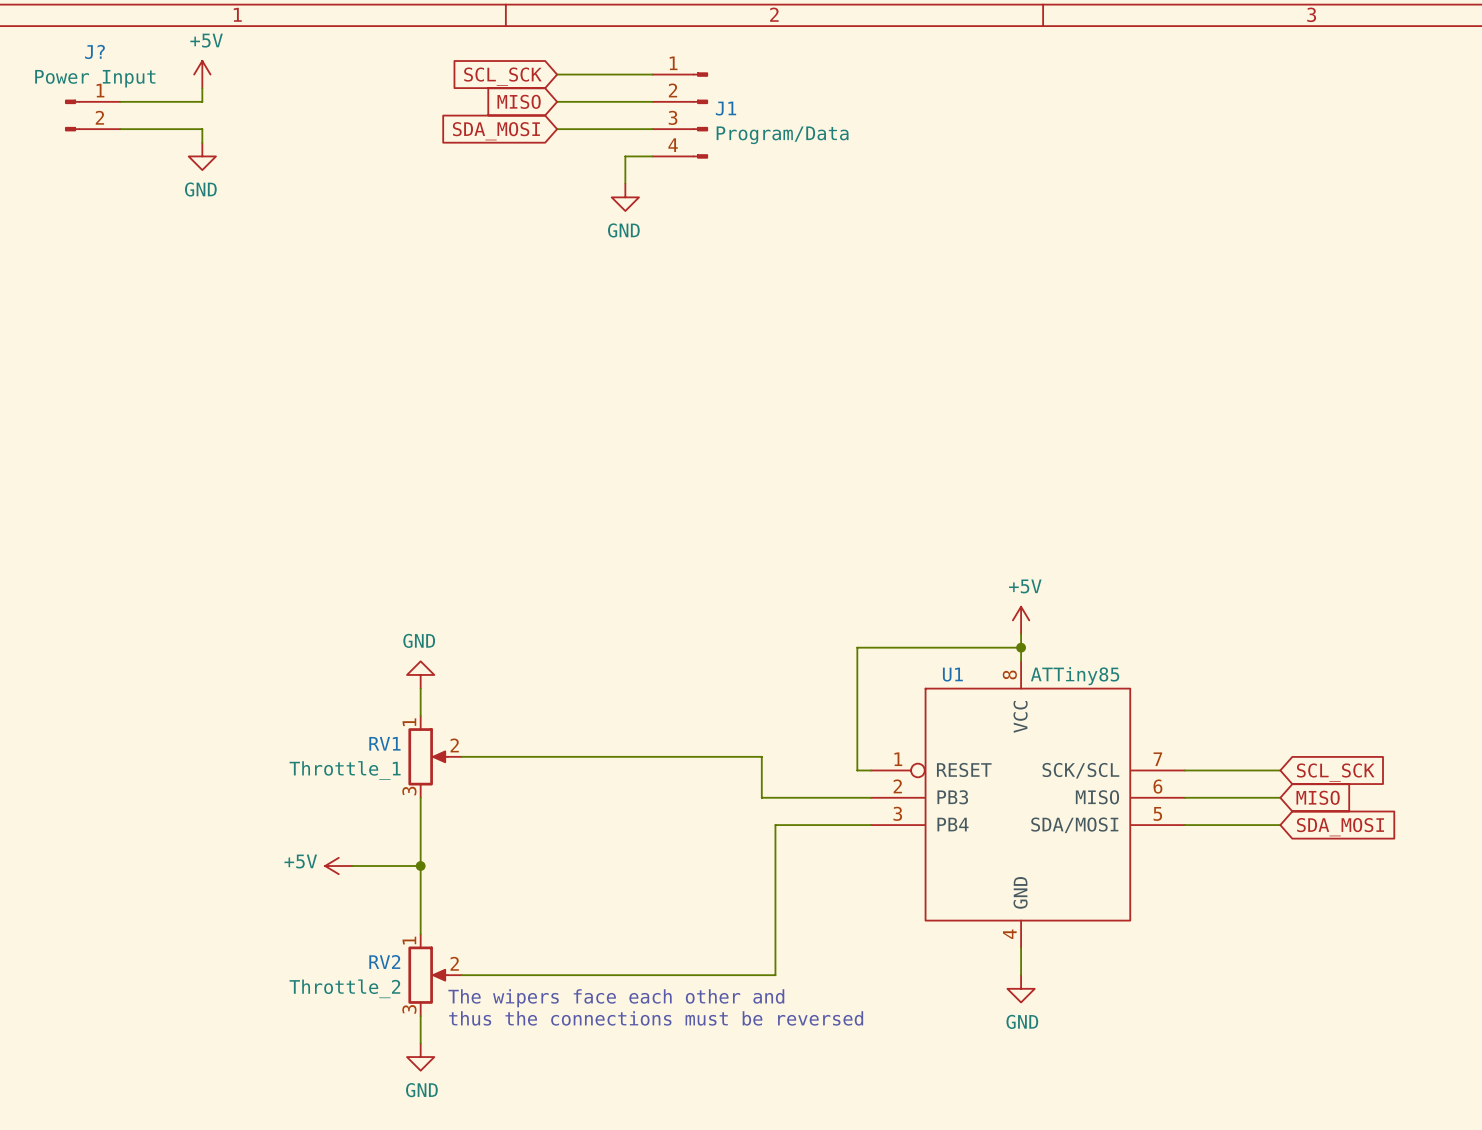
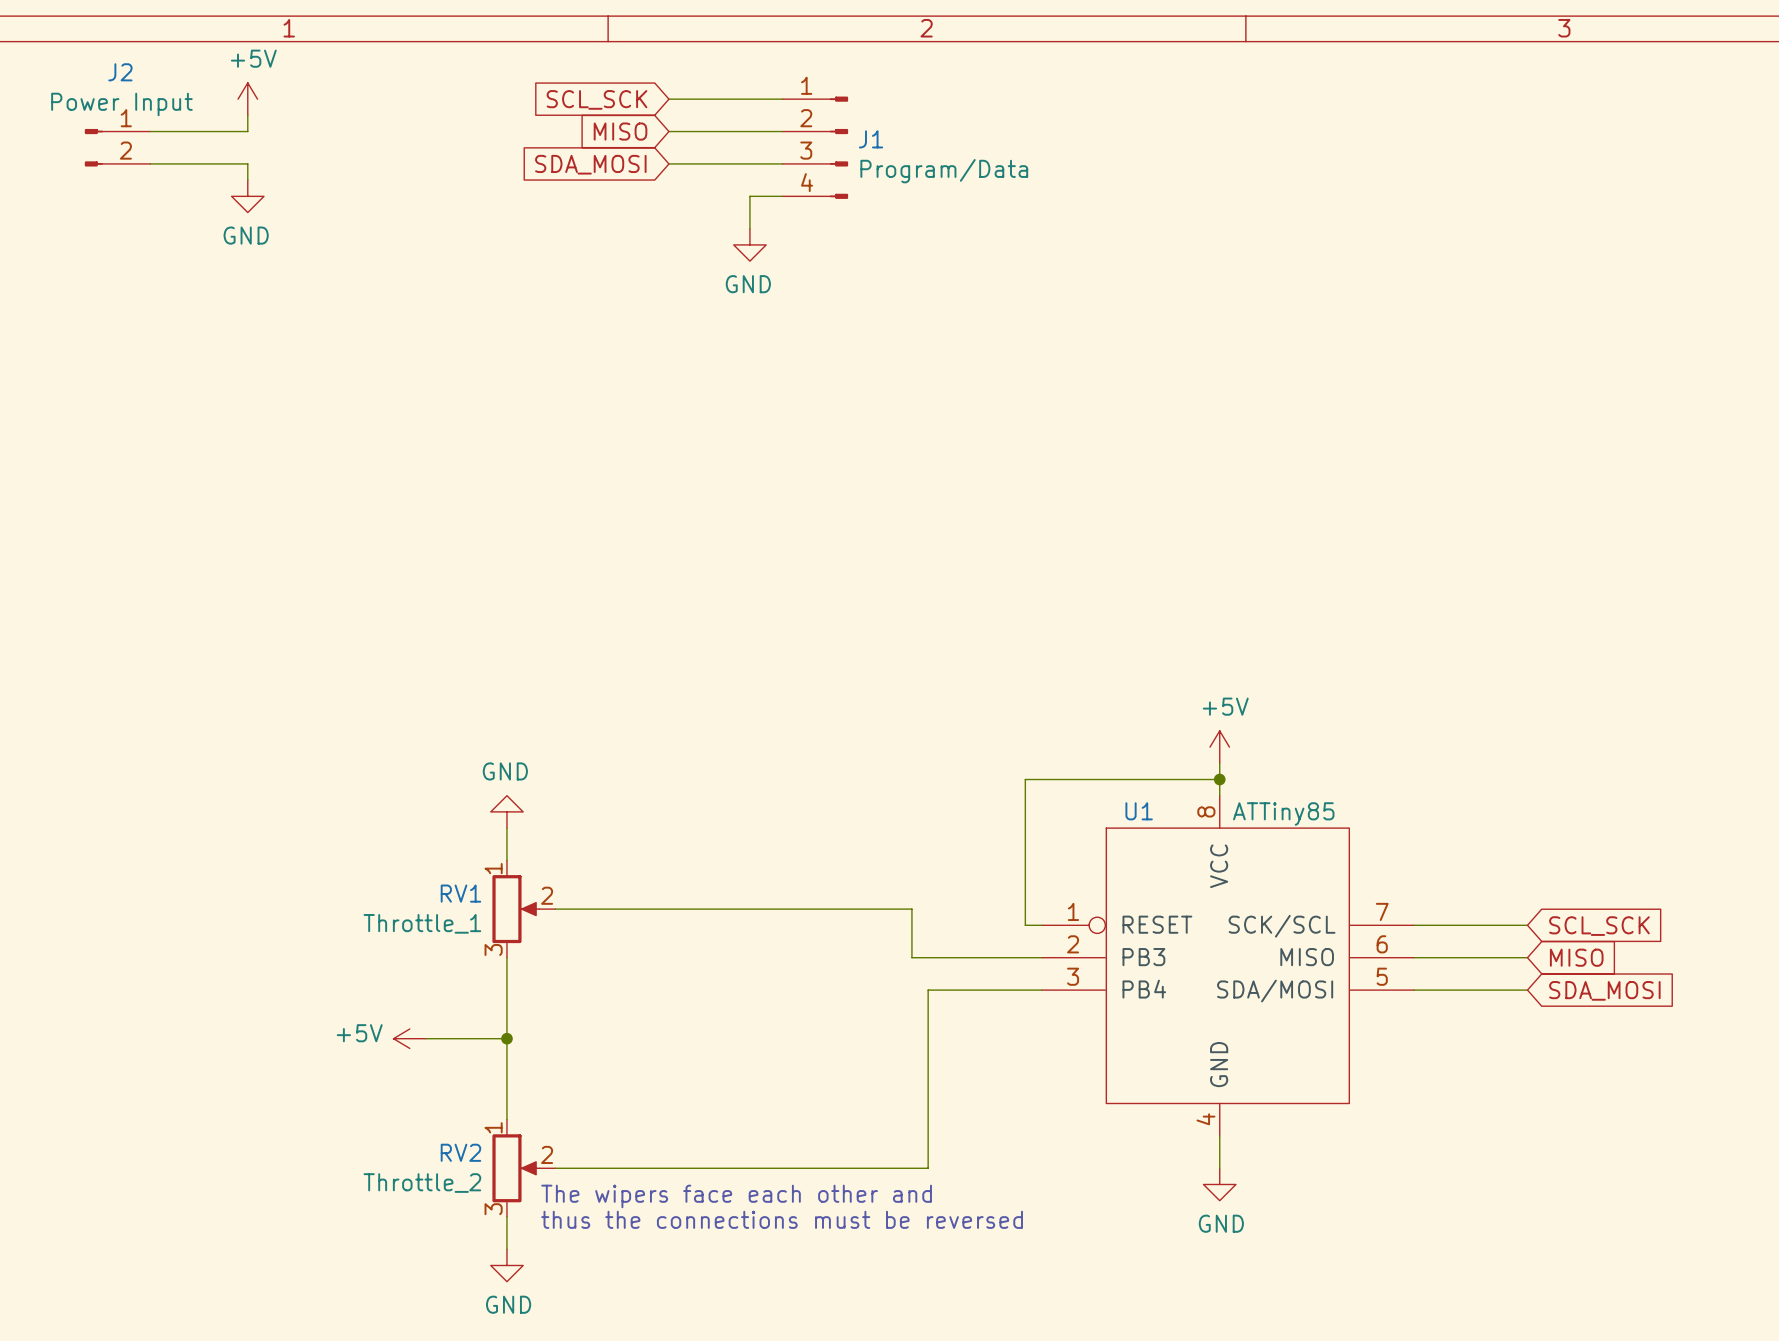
J? name: J? (94, 51) -> J2 (120, 72)

